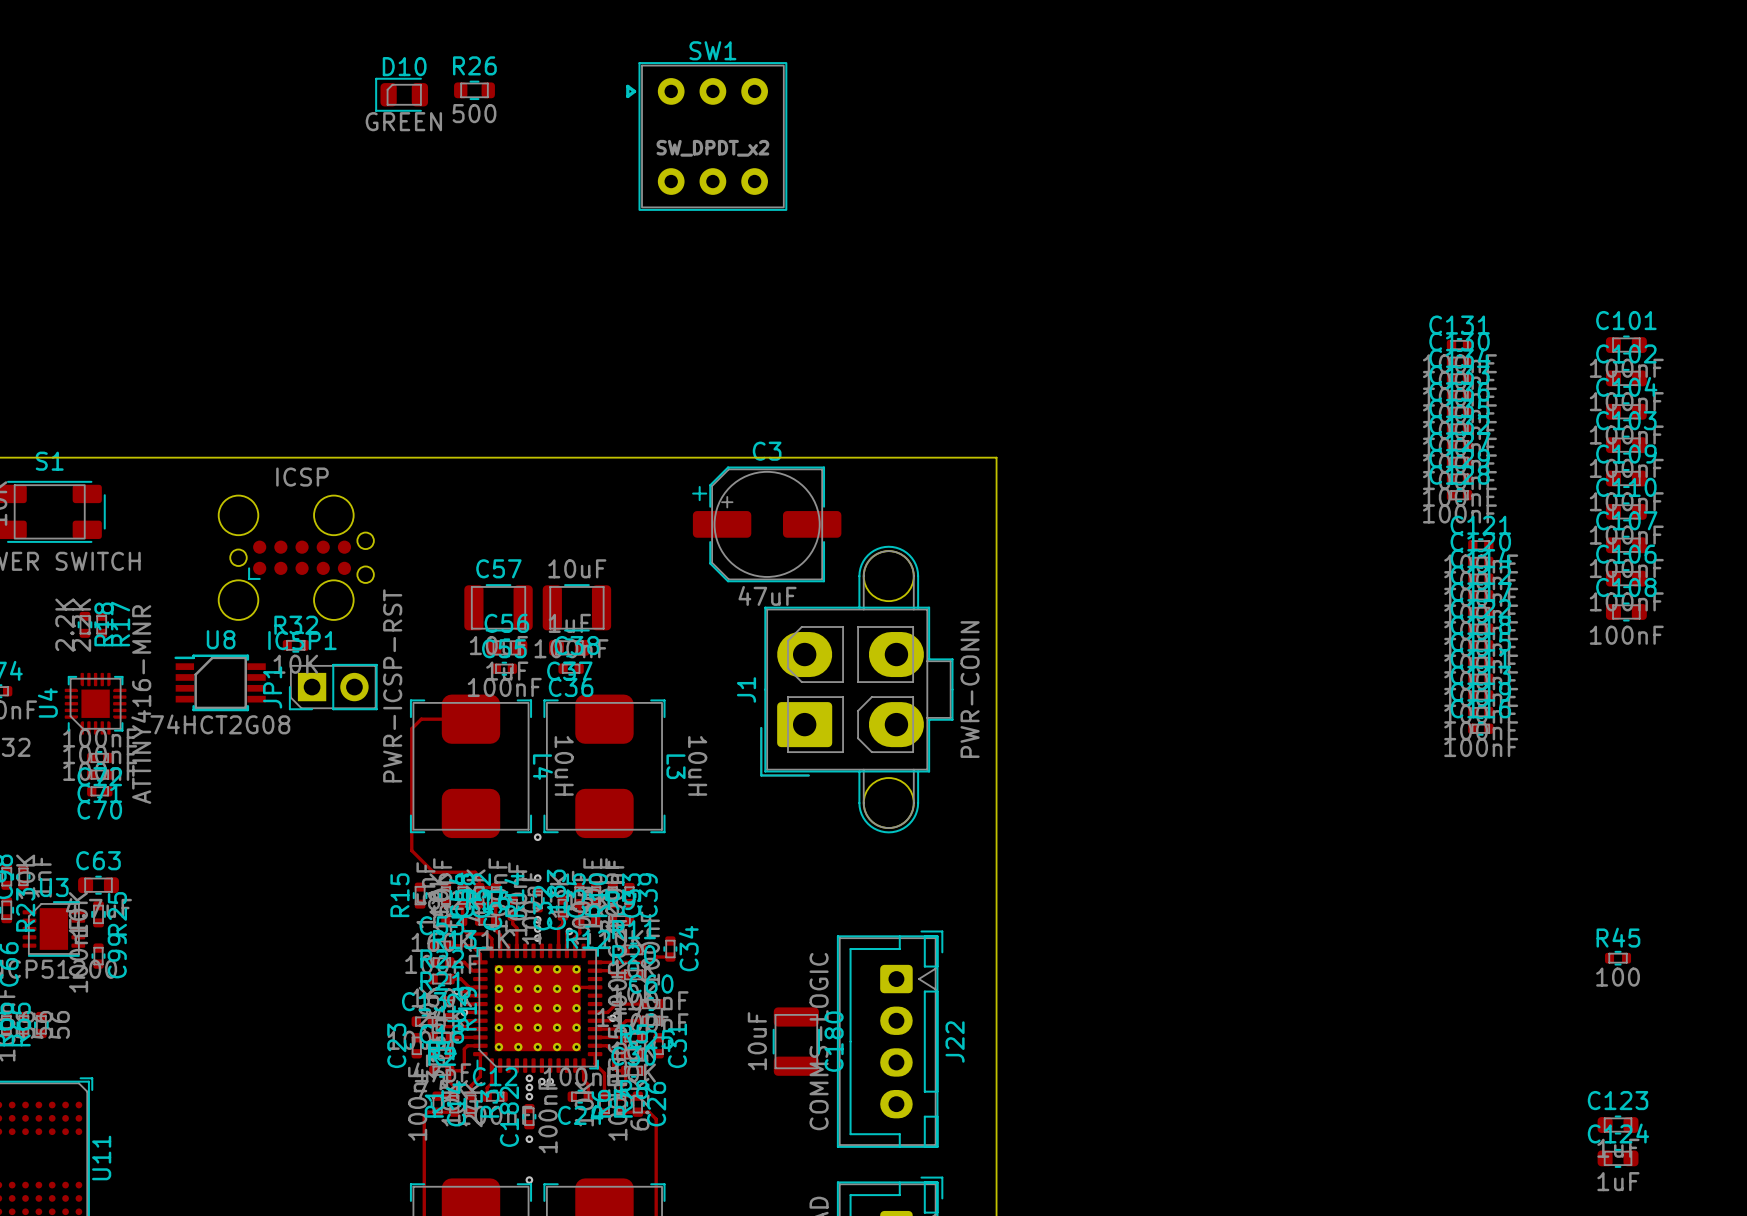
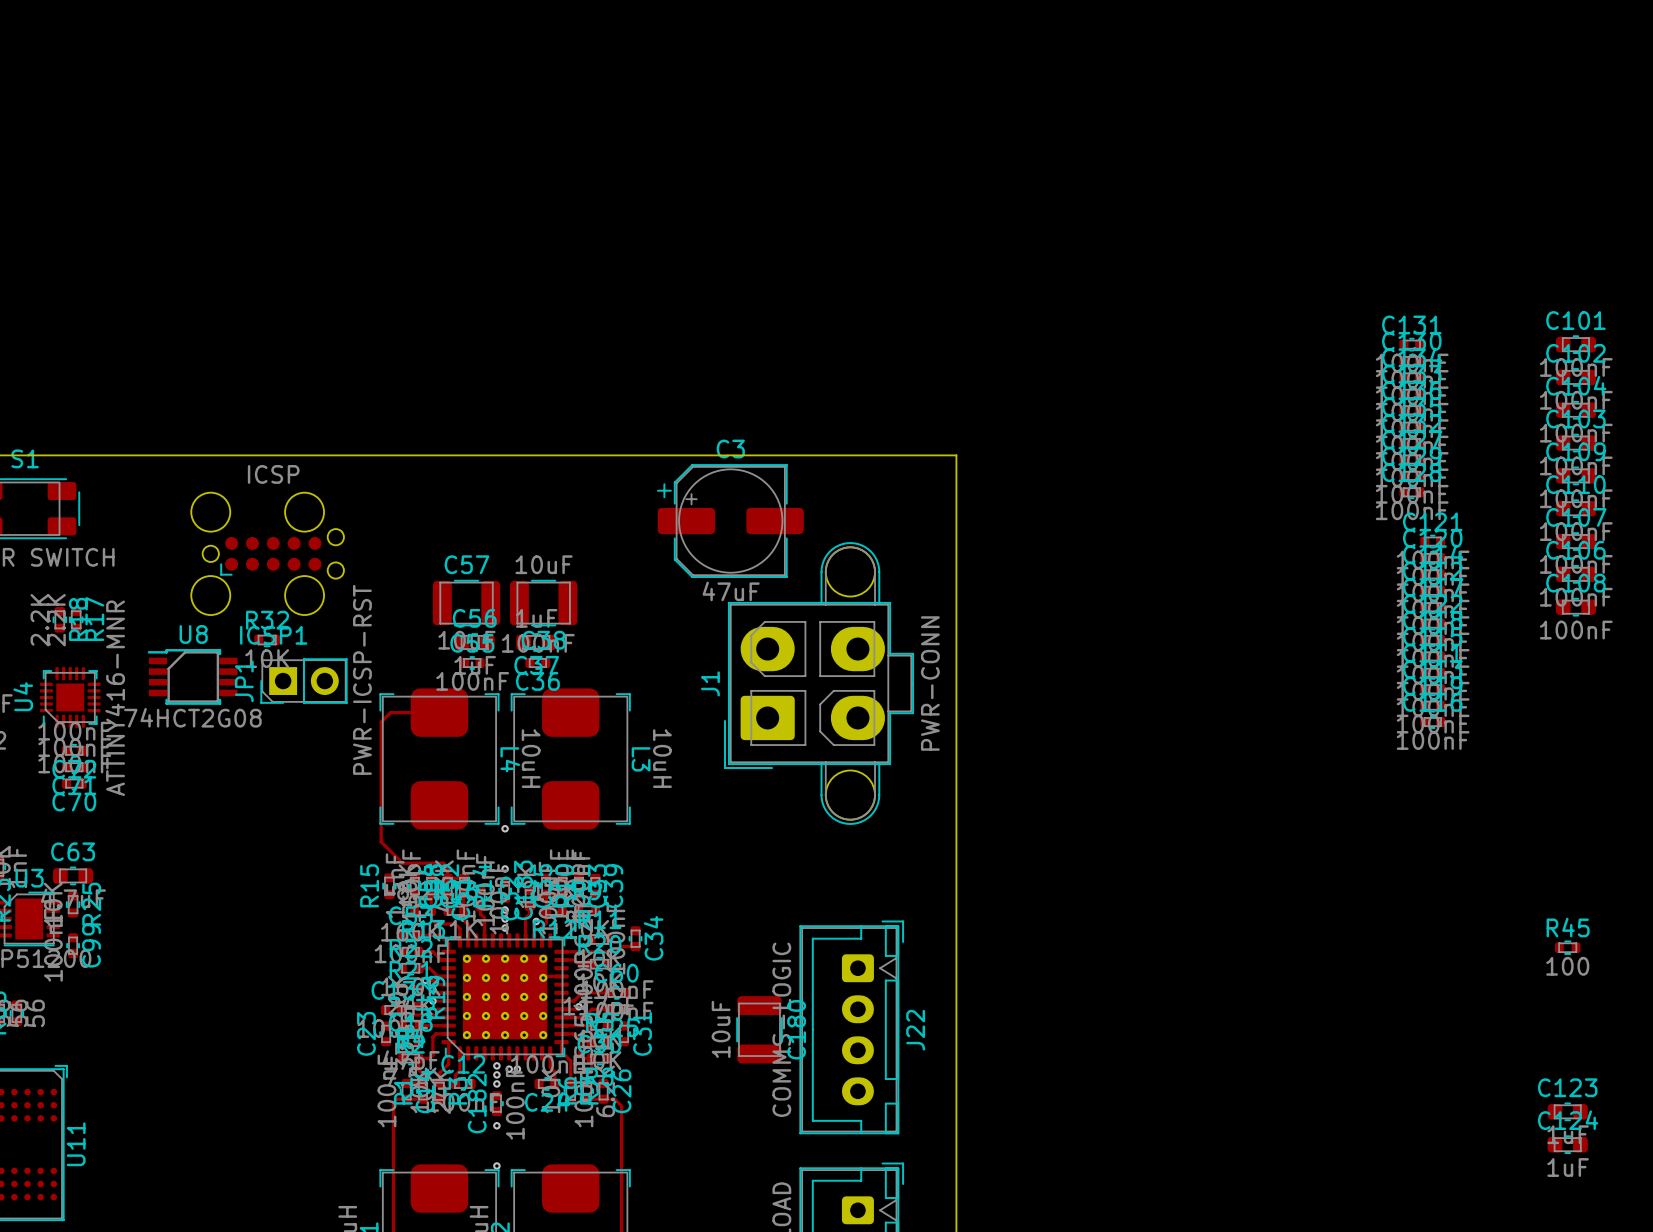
R26: 500 (474, 90) -> none
D10: GREEN (401, 94) -> none
SW1: SW_DPDT_x2 (706, 136) -> none

